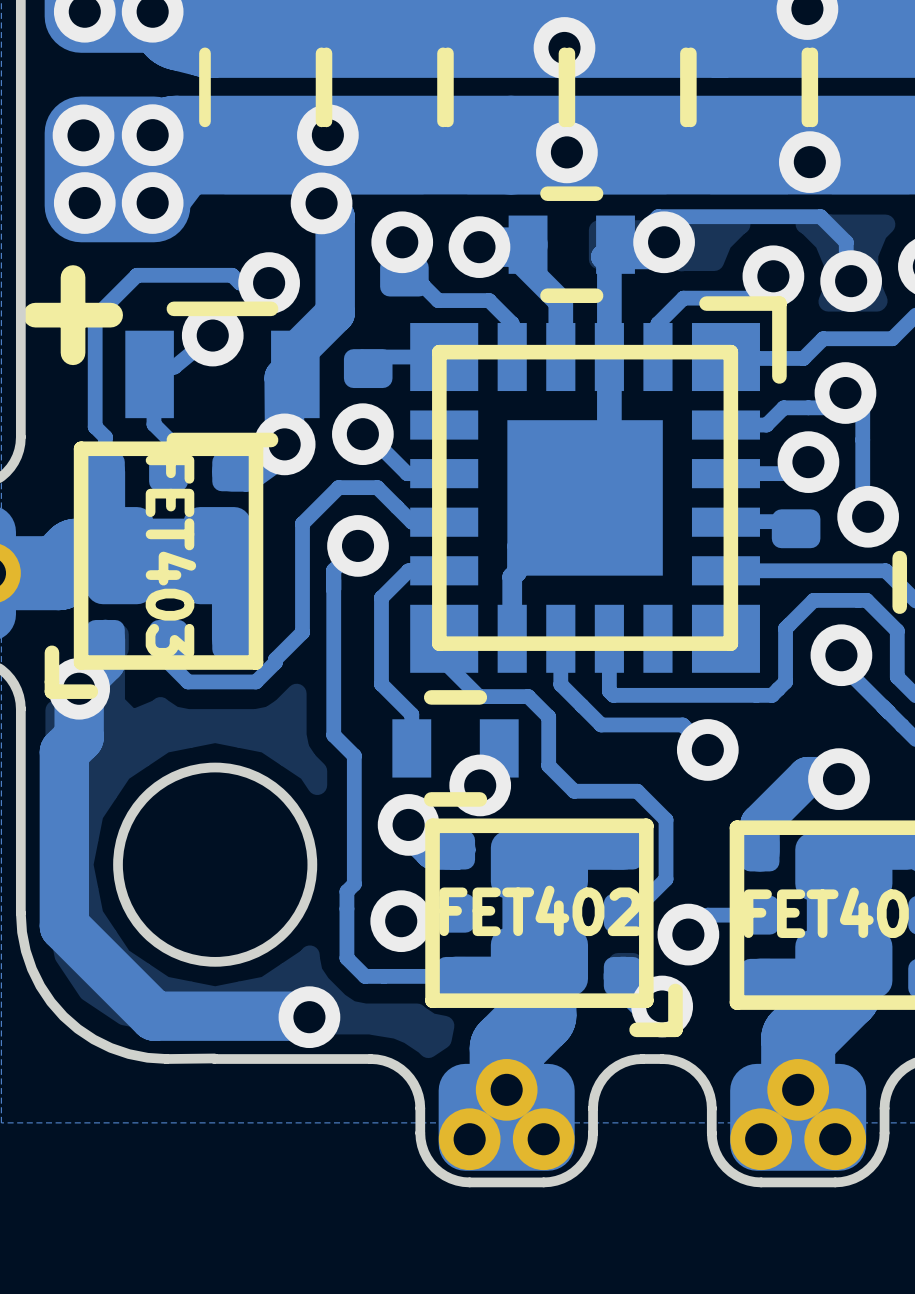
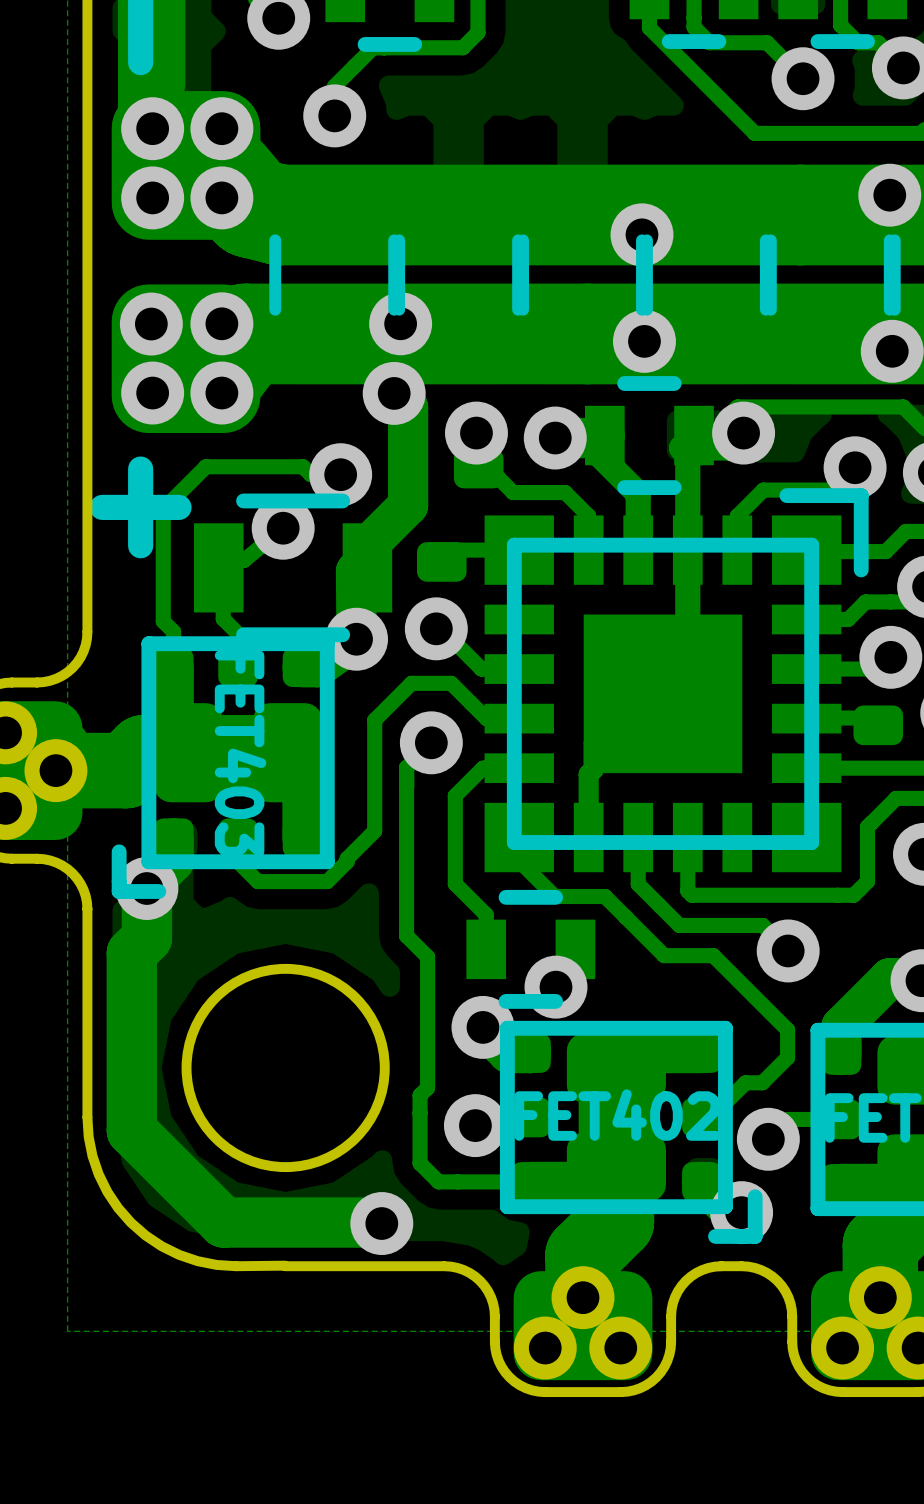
track: (548, 716) (548, 765) (574, 791) (637, 791) (666, 819) (666, 879) -> (625, 917) (664, 955) (713, 955) (787, 1029) (787, 1057) (762, 1082) (745, 1082)

